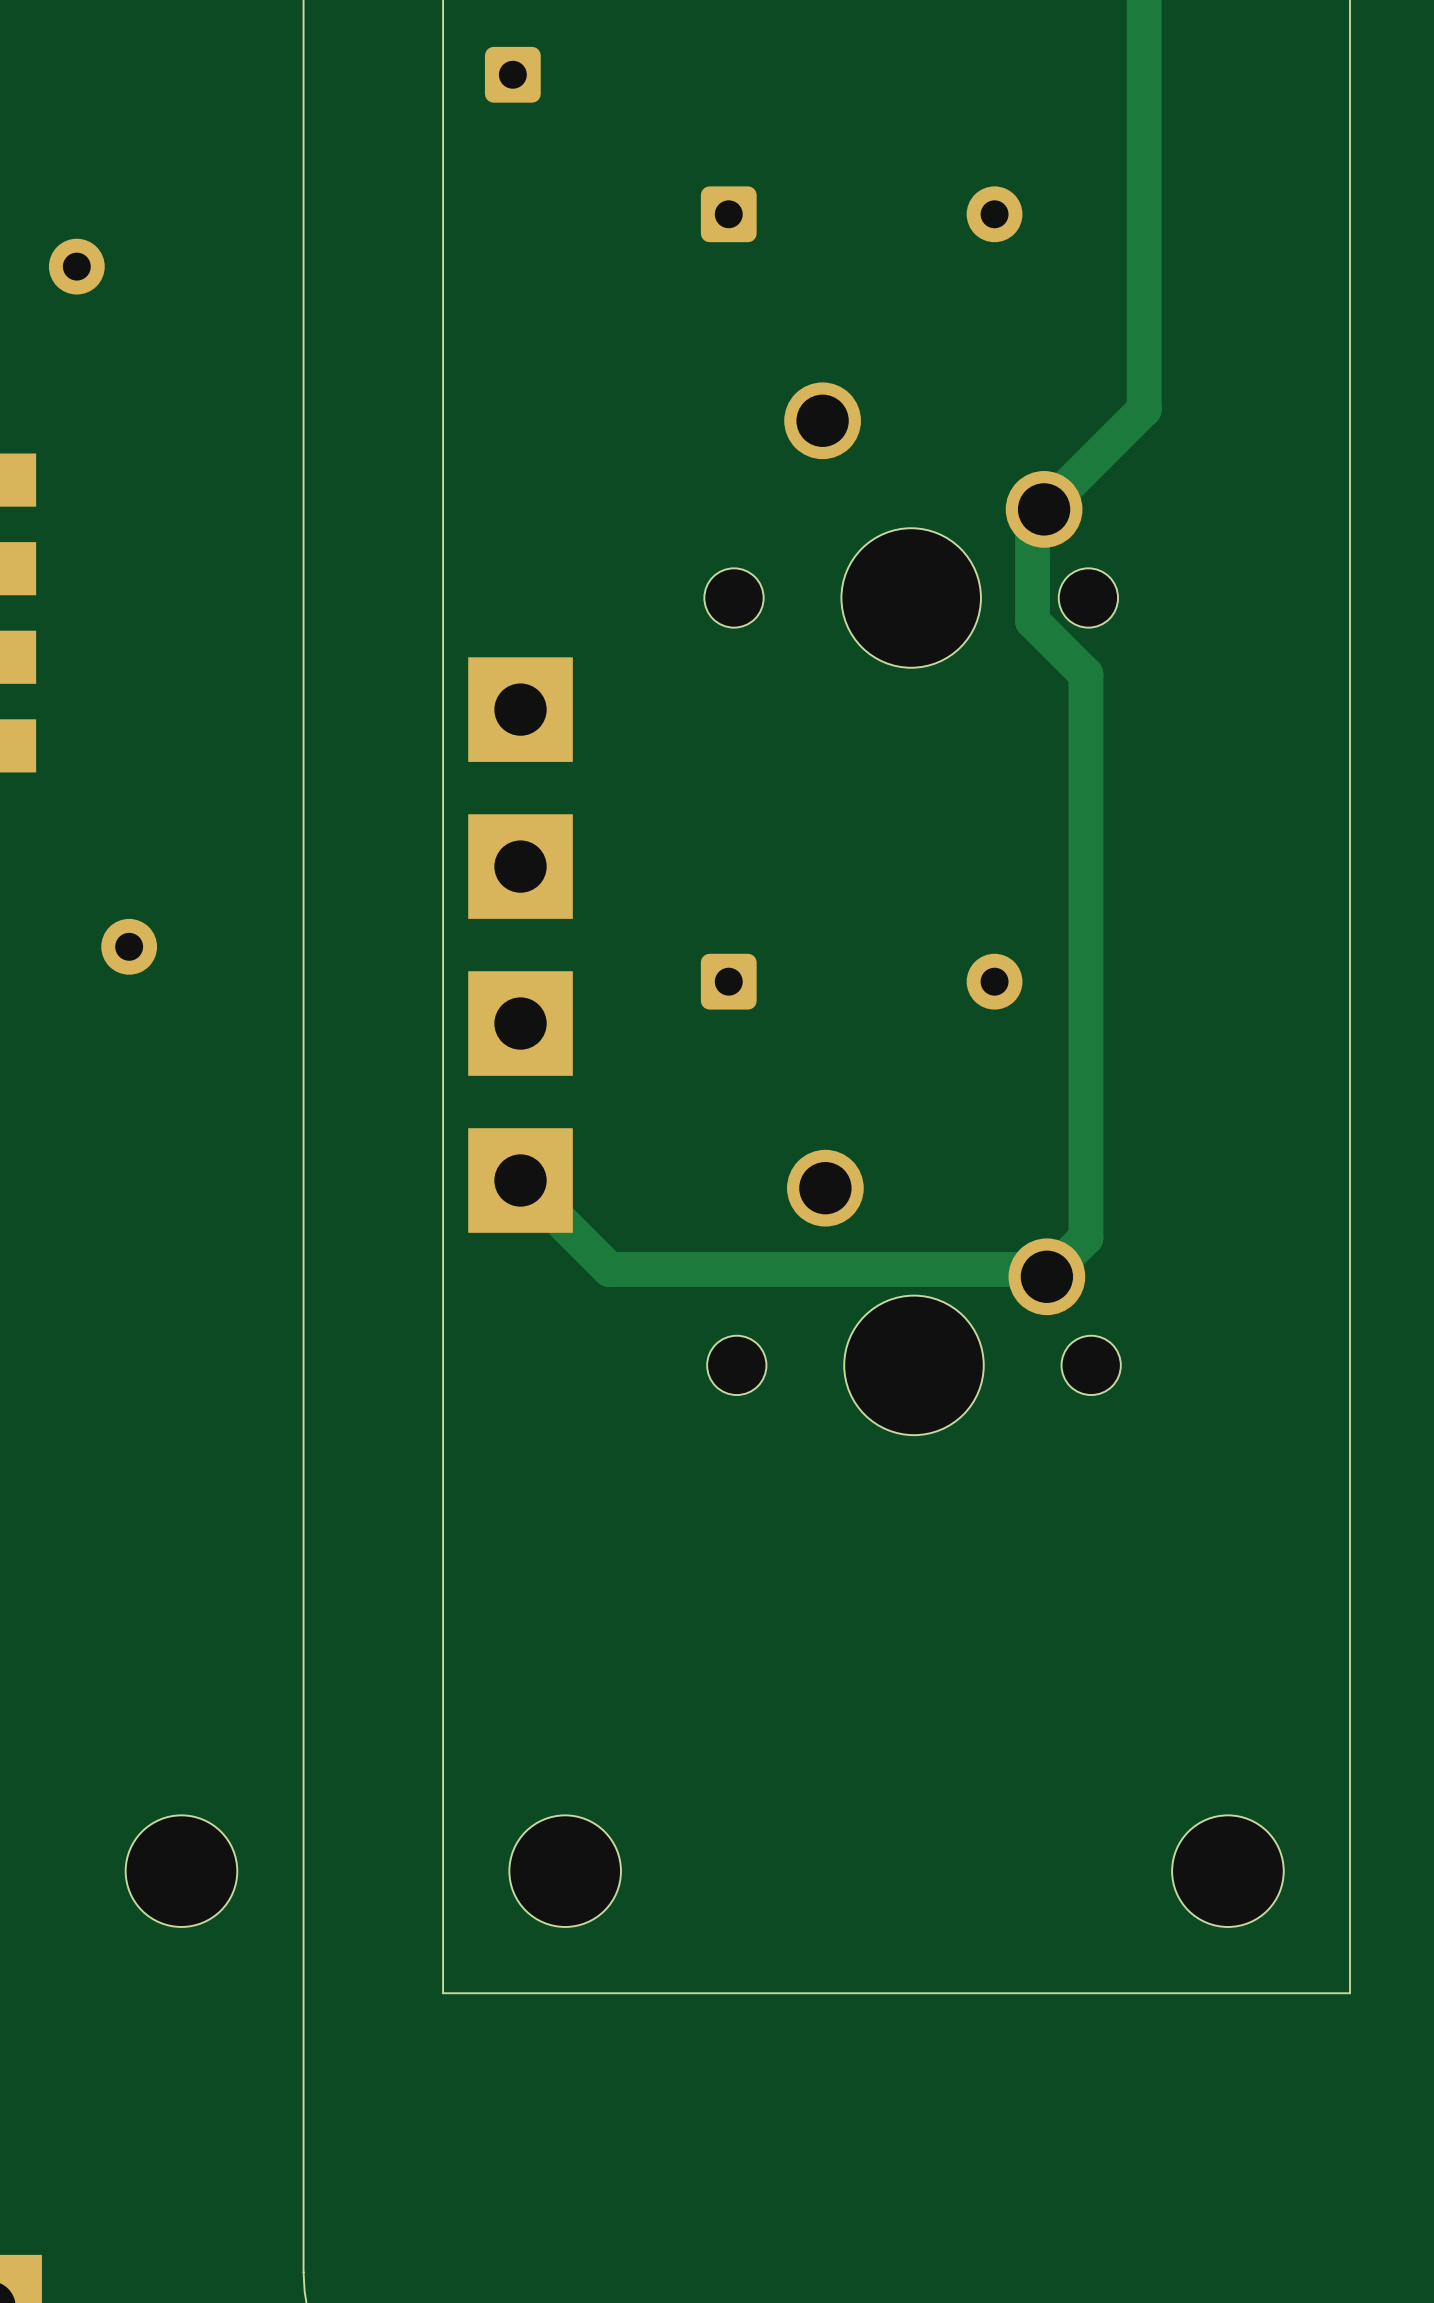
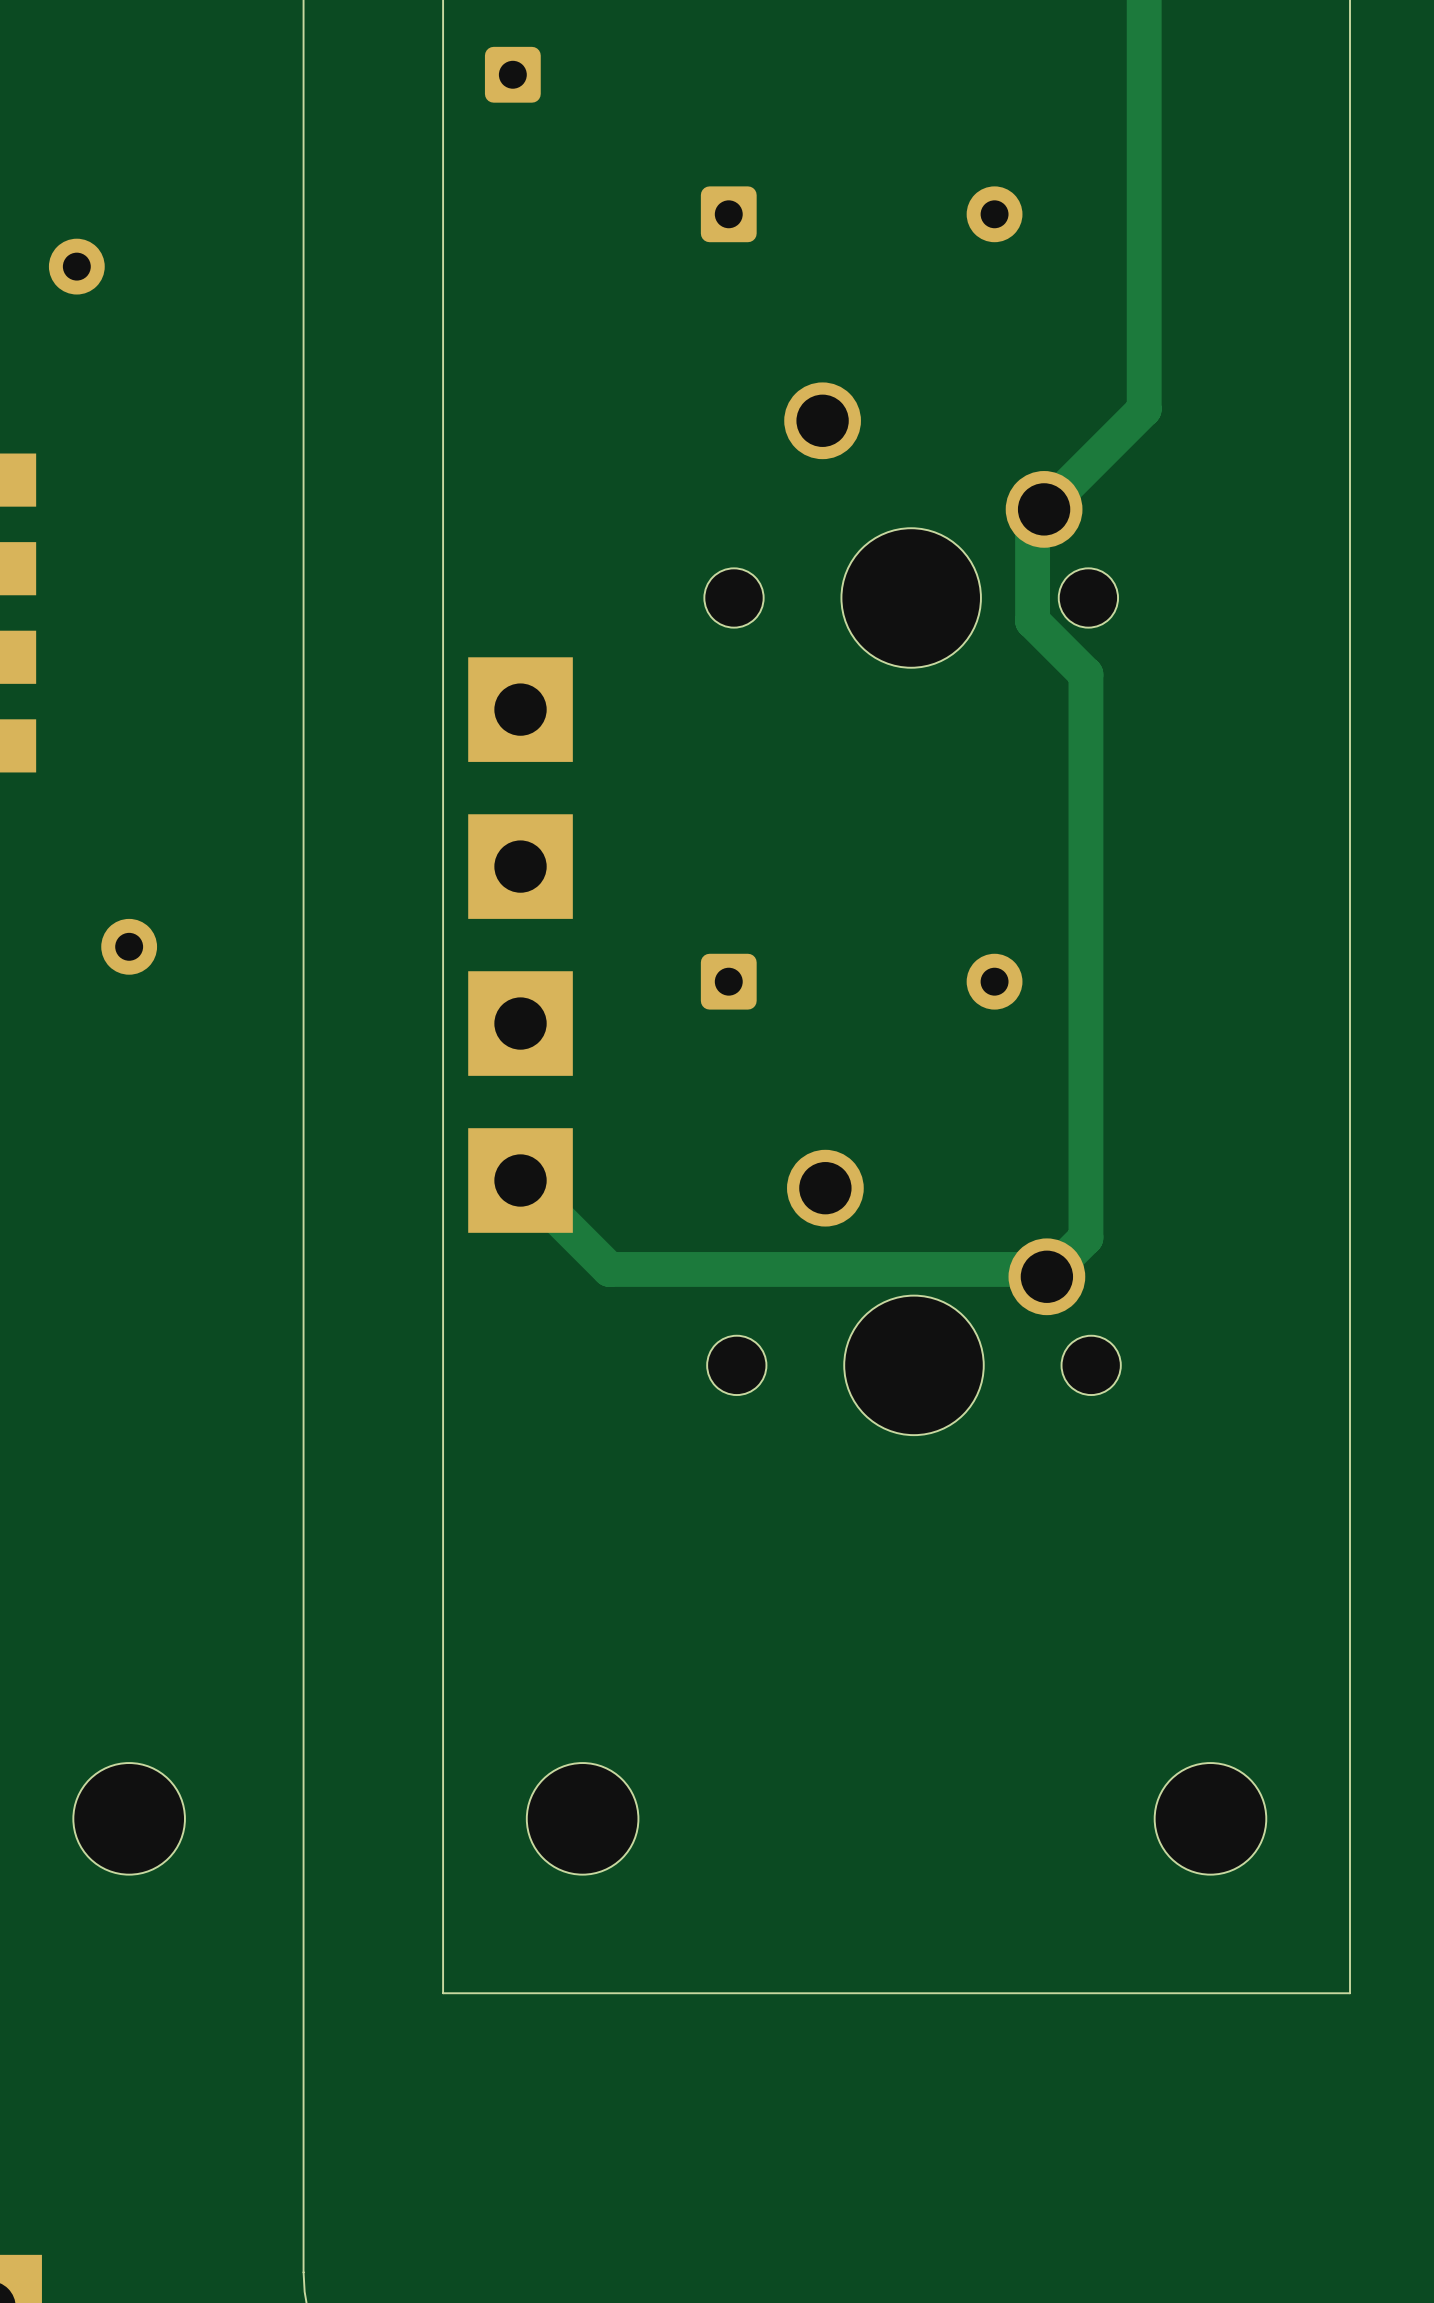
part position: (181, 1871) -> (129, 1818)
part position: (565, 1871) -> (582, 1818)
part position: (1227, 1871) -> (1210, 1818)

